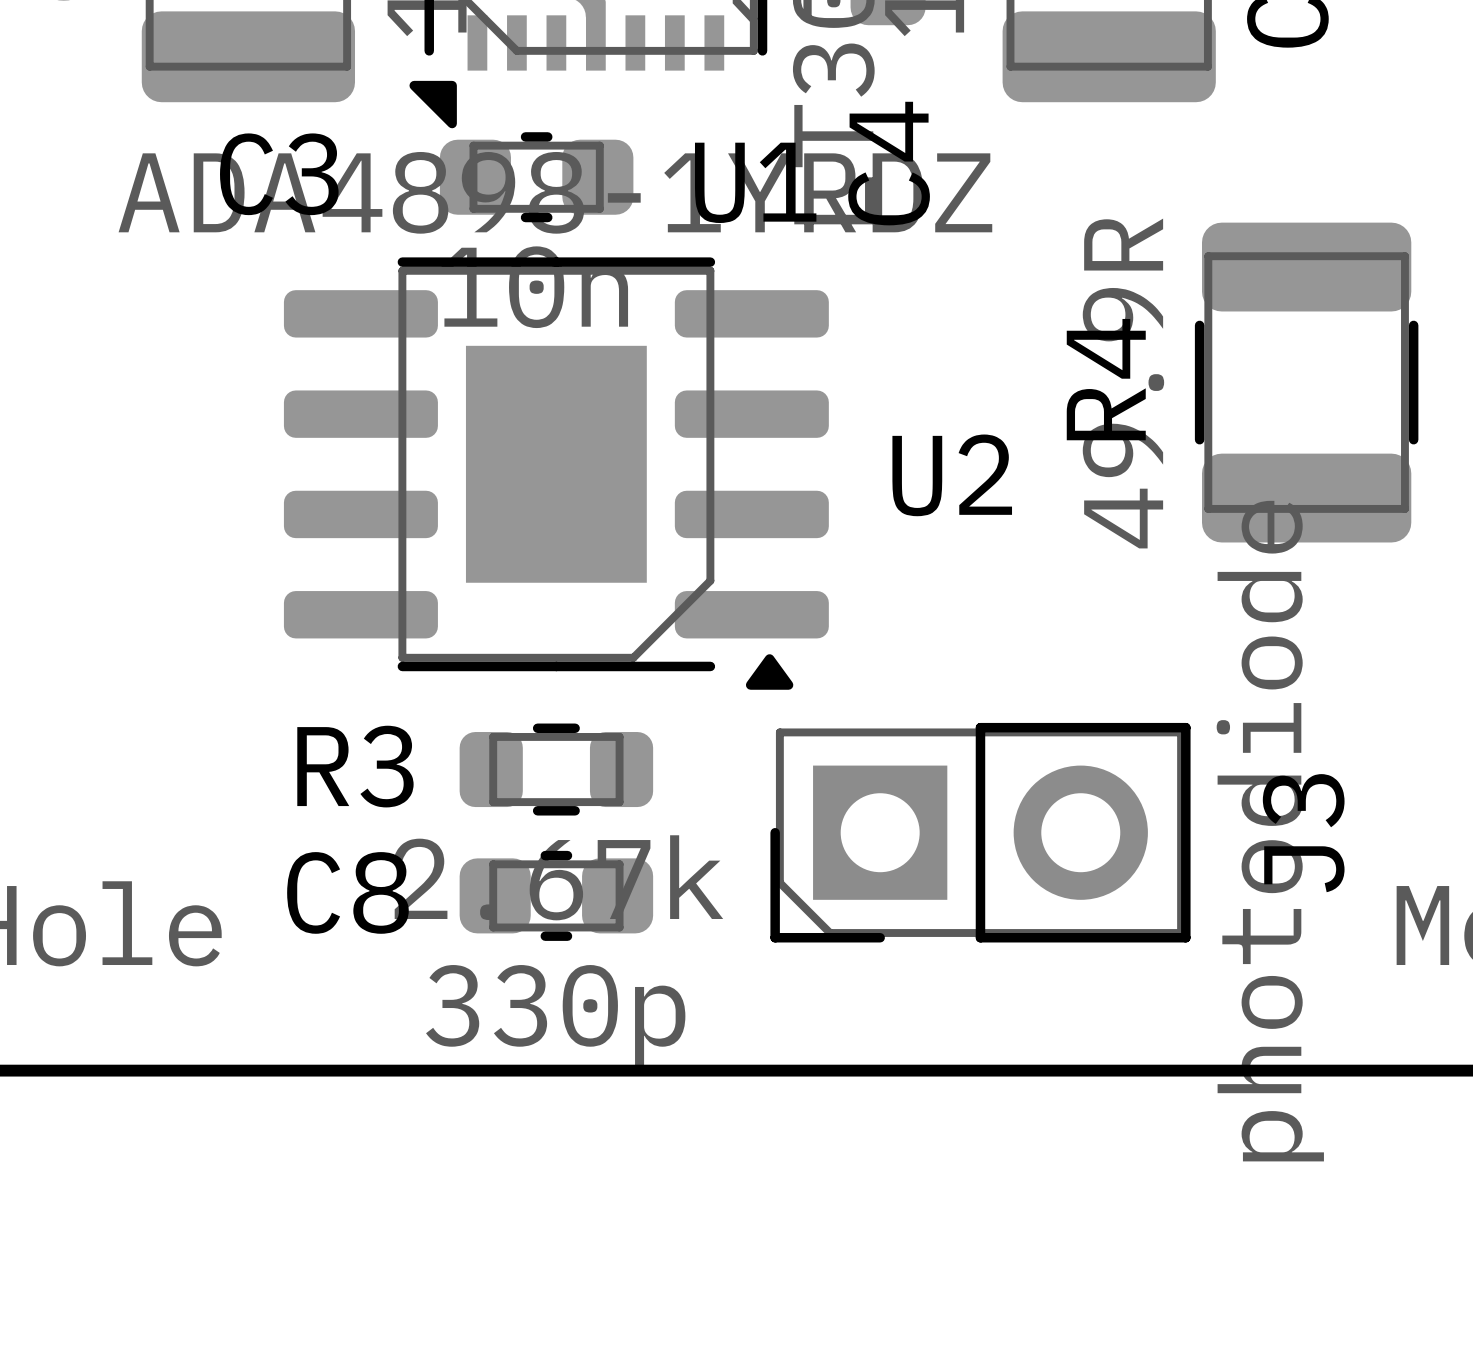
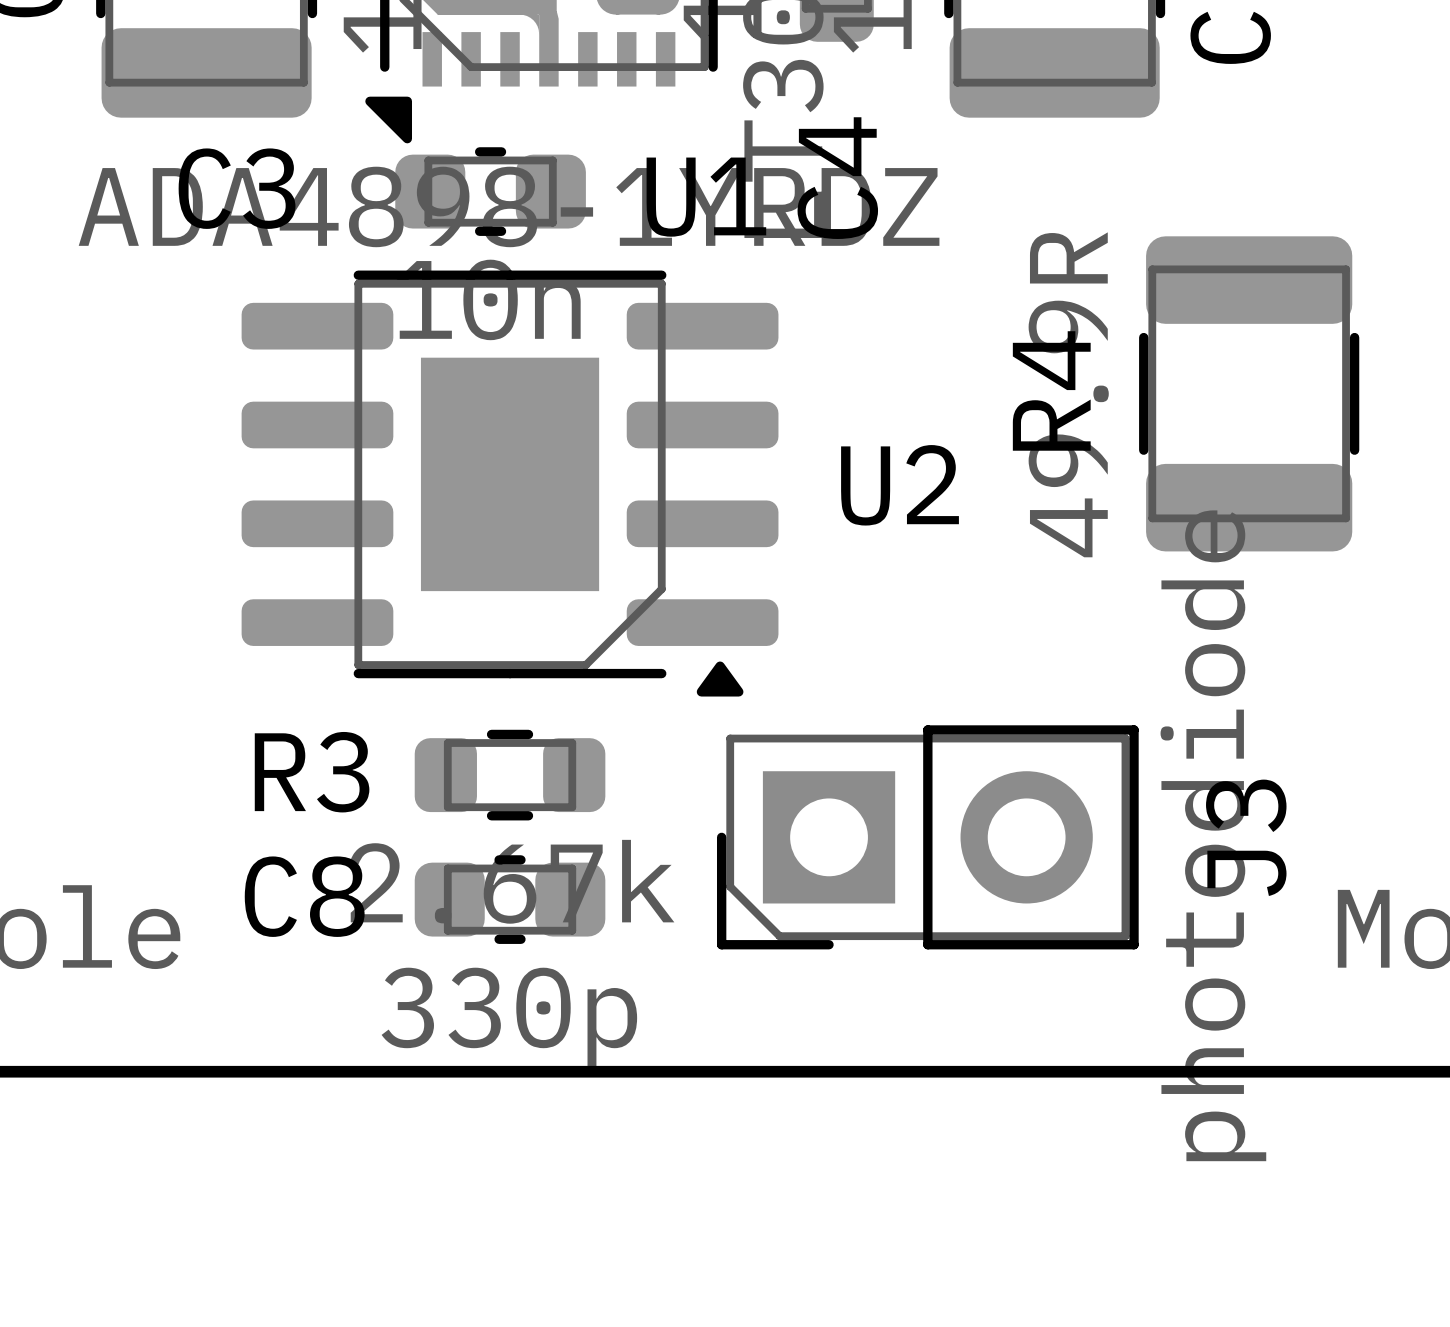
J3 footprint: [770, 722, 1191, 943] -> [716, 725, 1139, 950]

